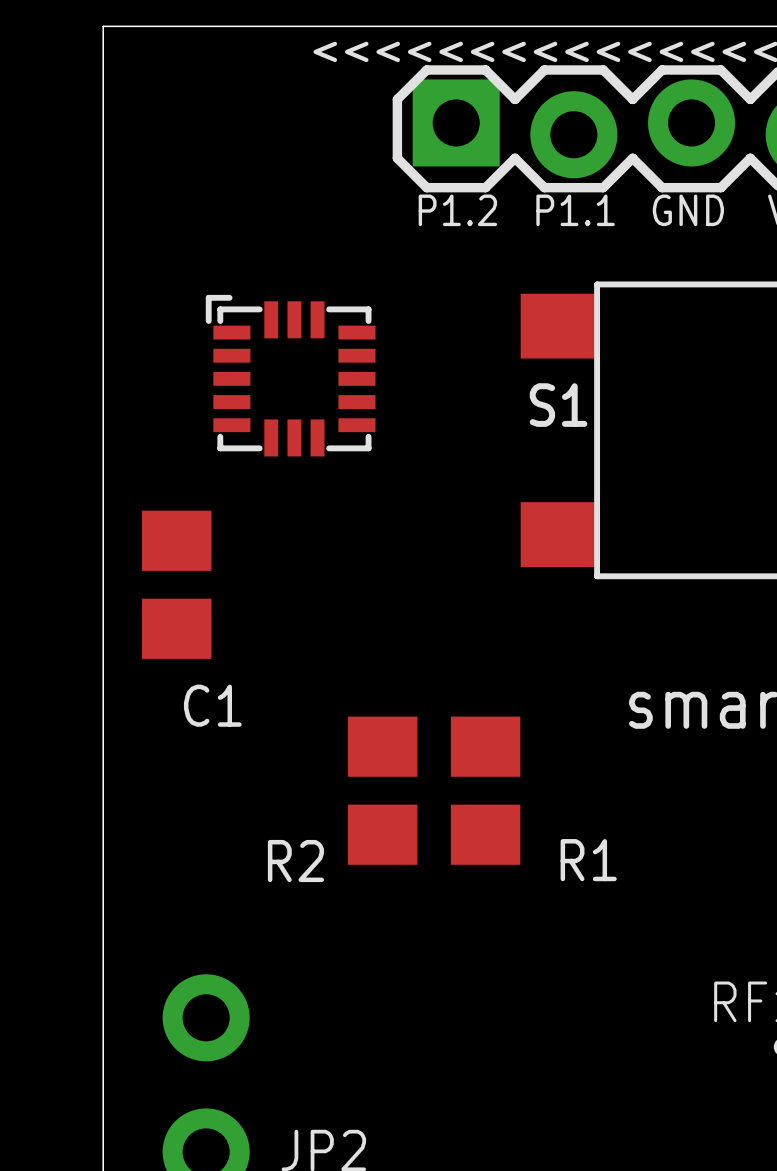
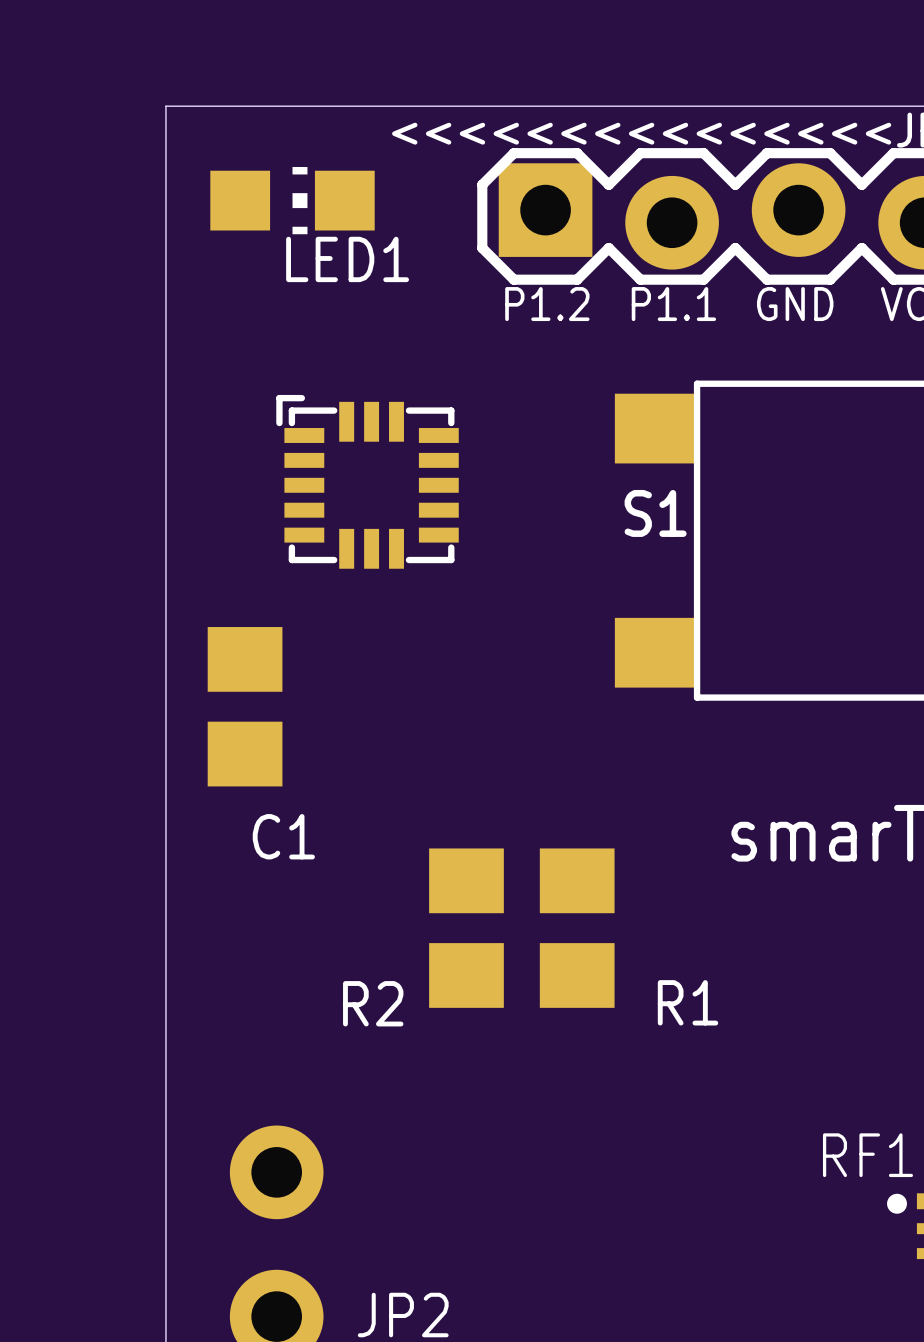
LED1: none -> (292, 200)

